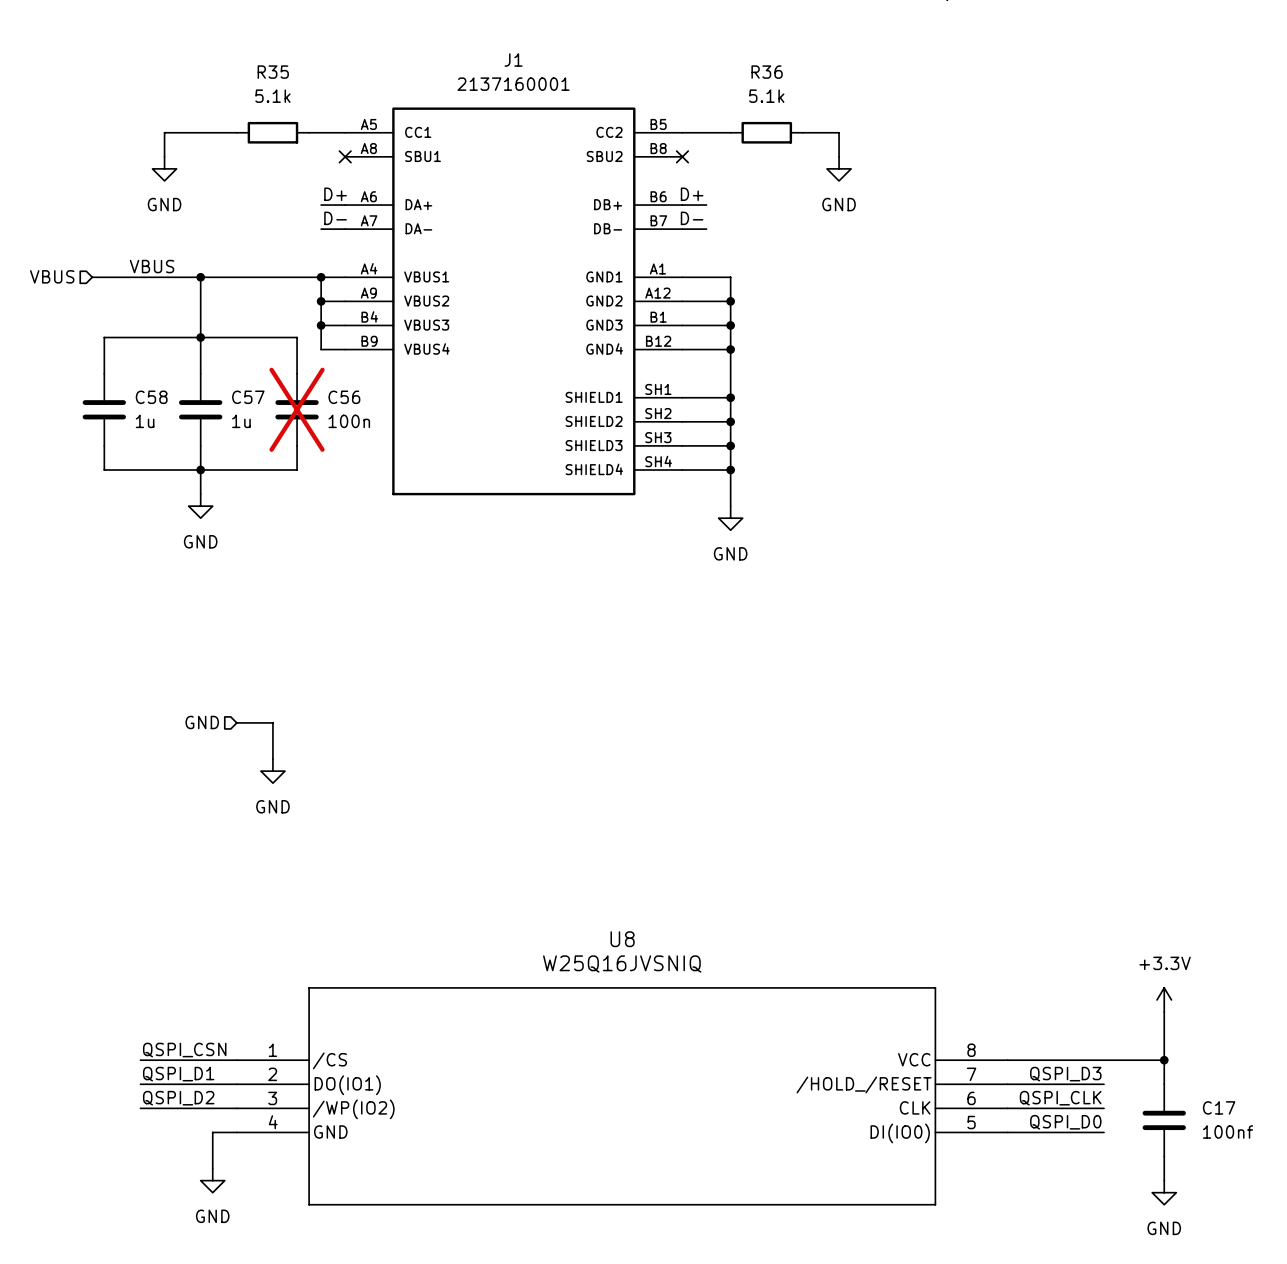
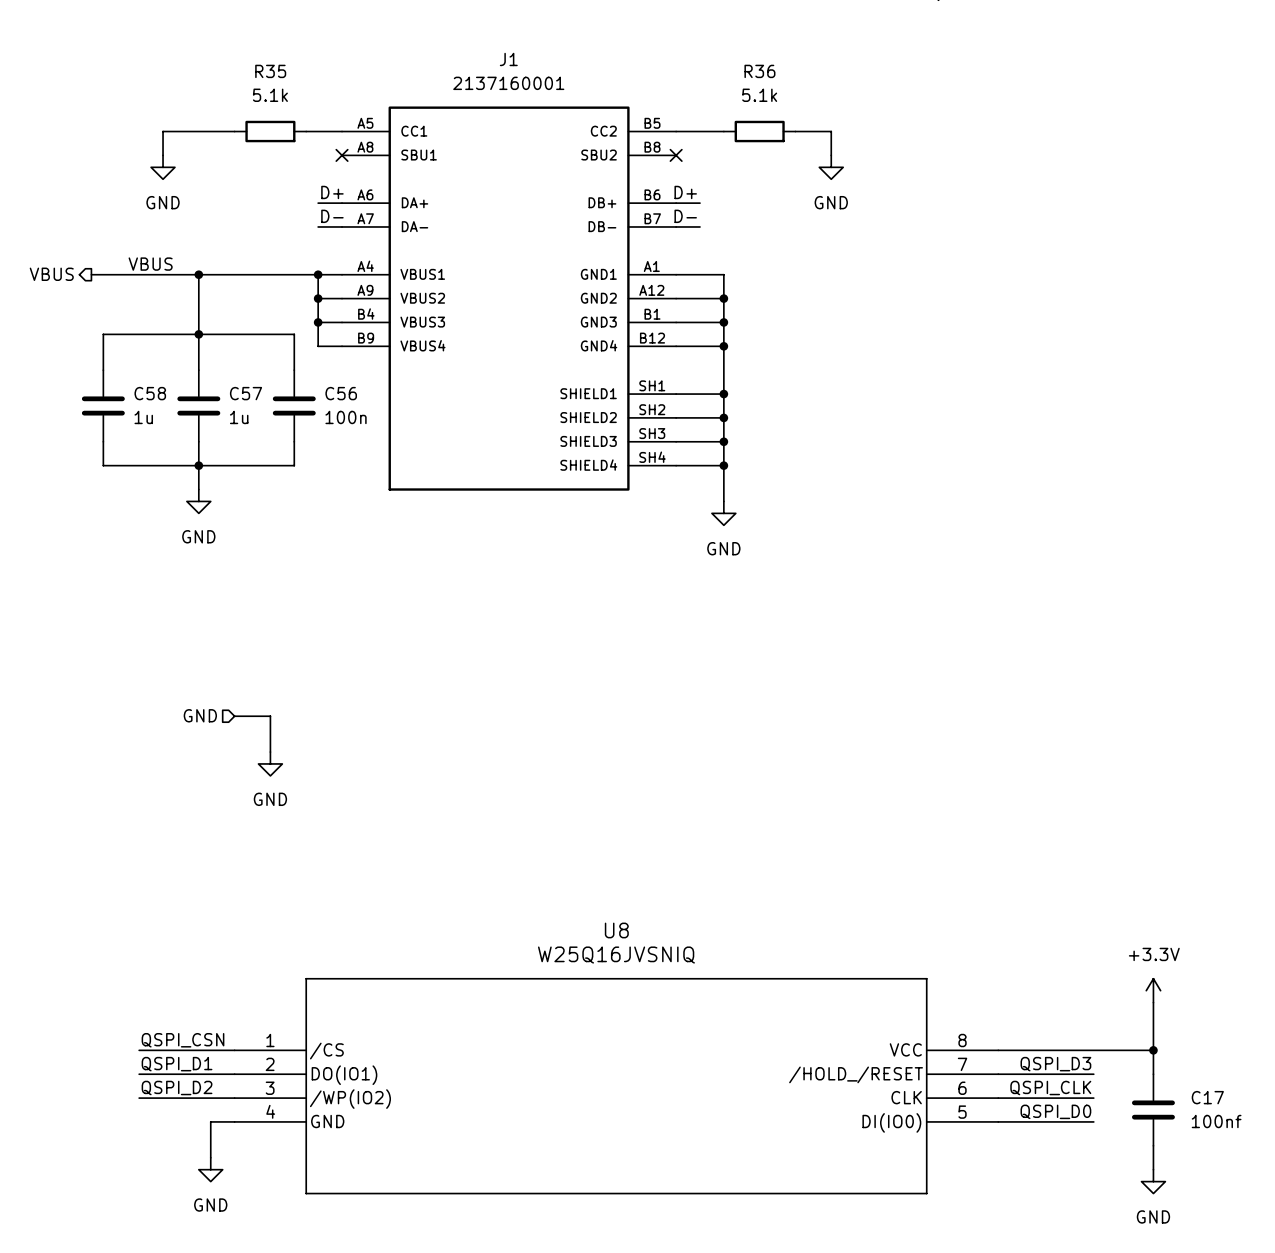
hierarchical label shape: input (52, 276) -> output (51, 274)
C56 do-not-place cross: (297, 409) -> none

